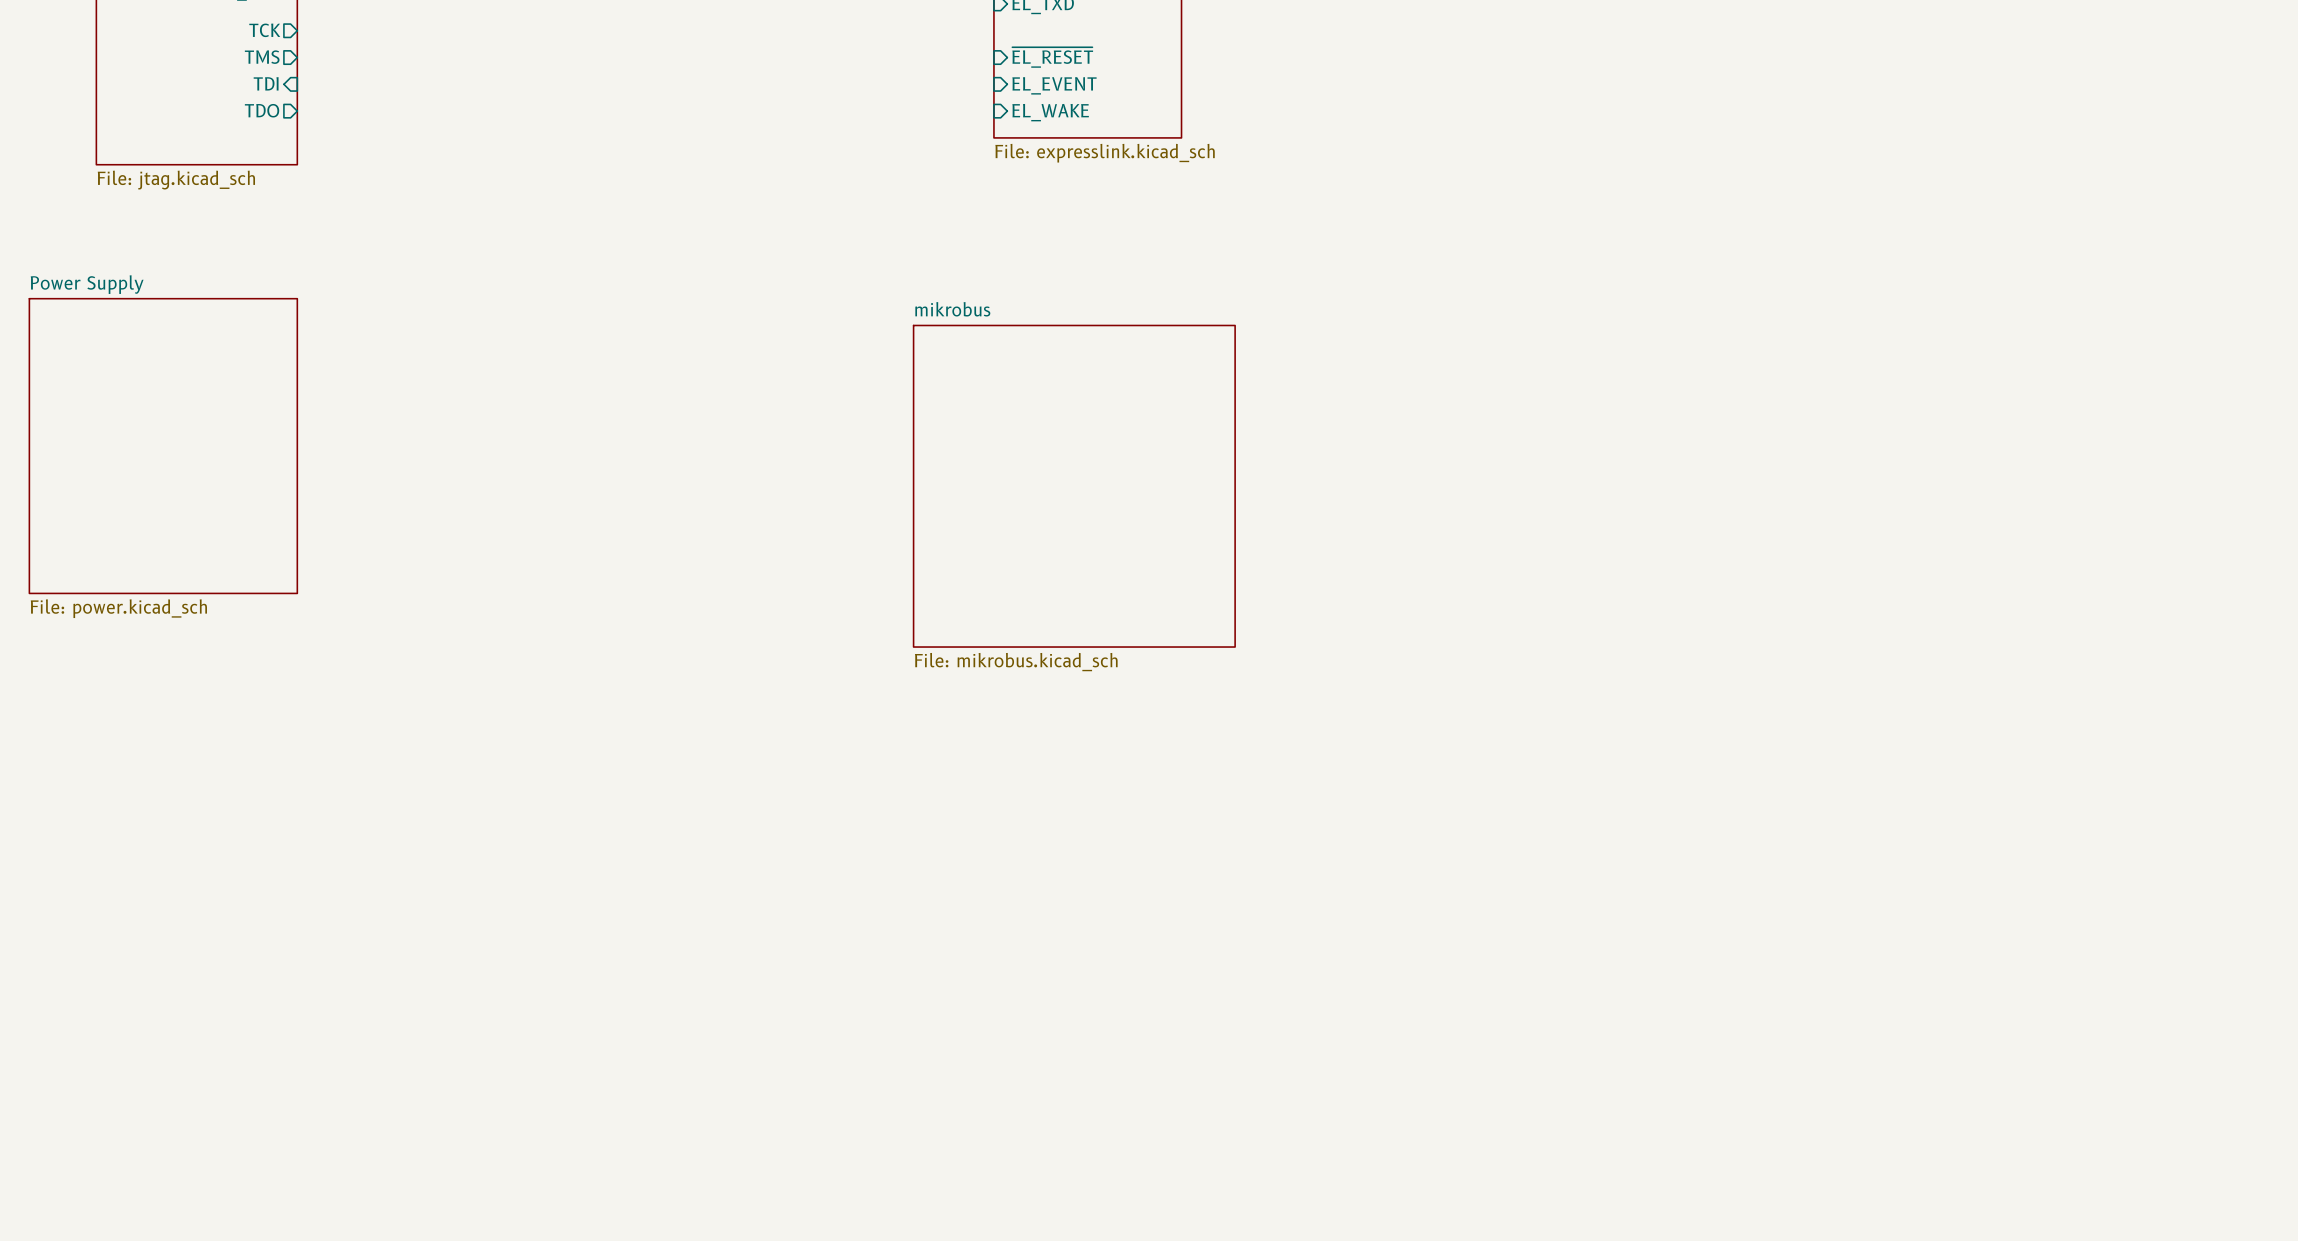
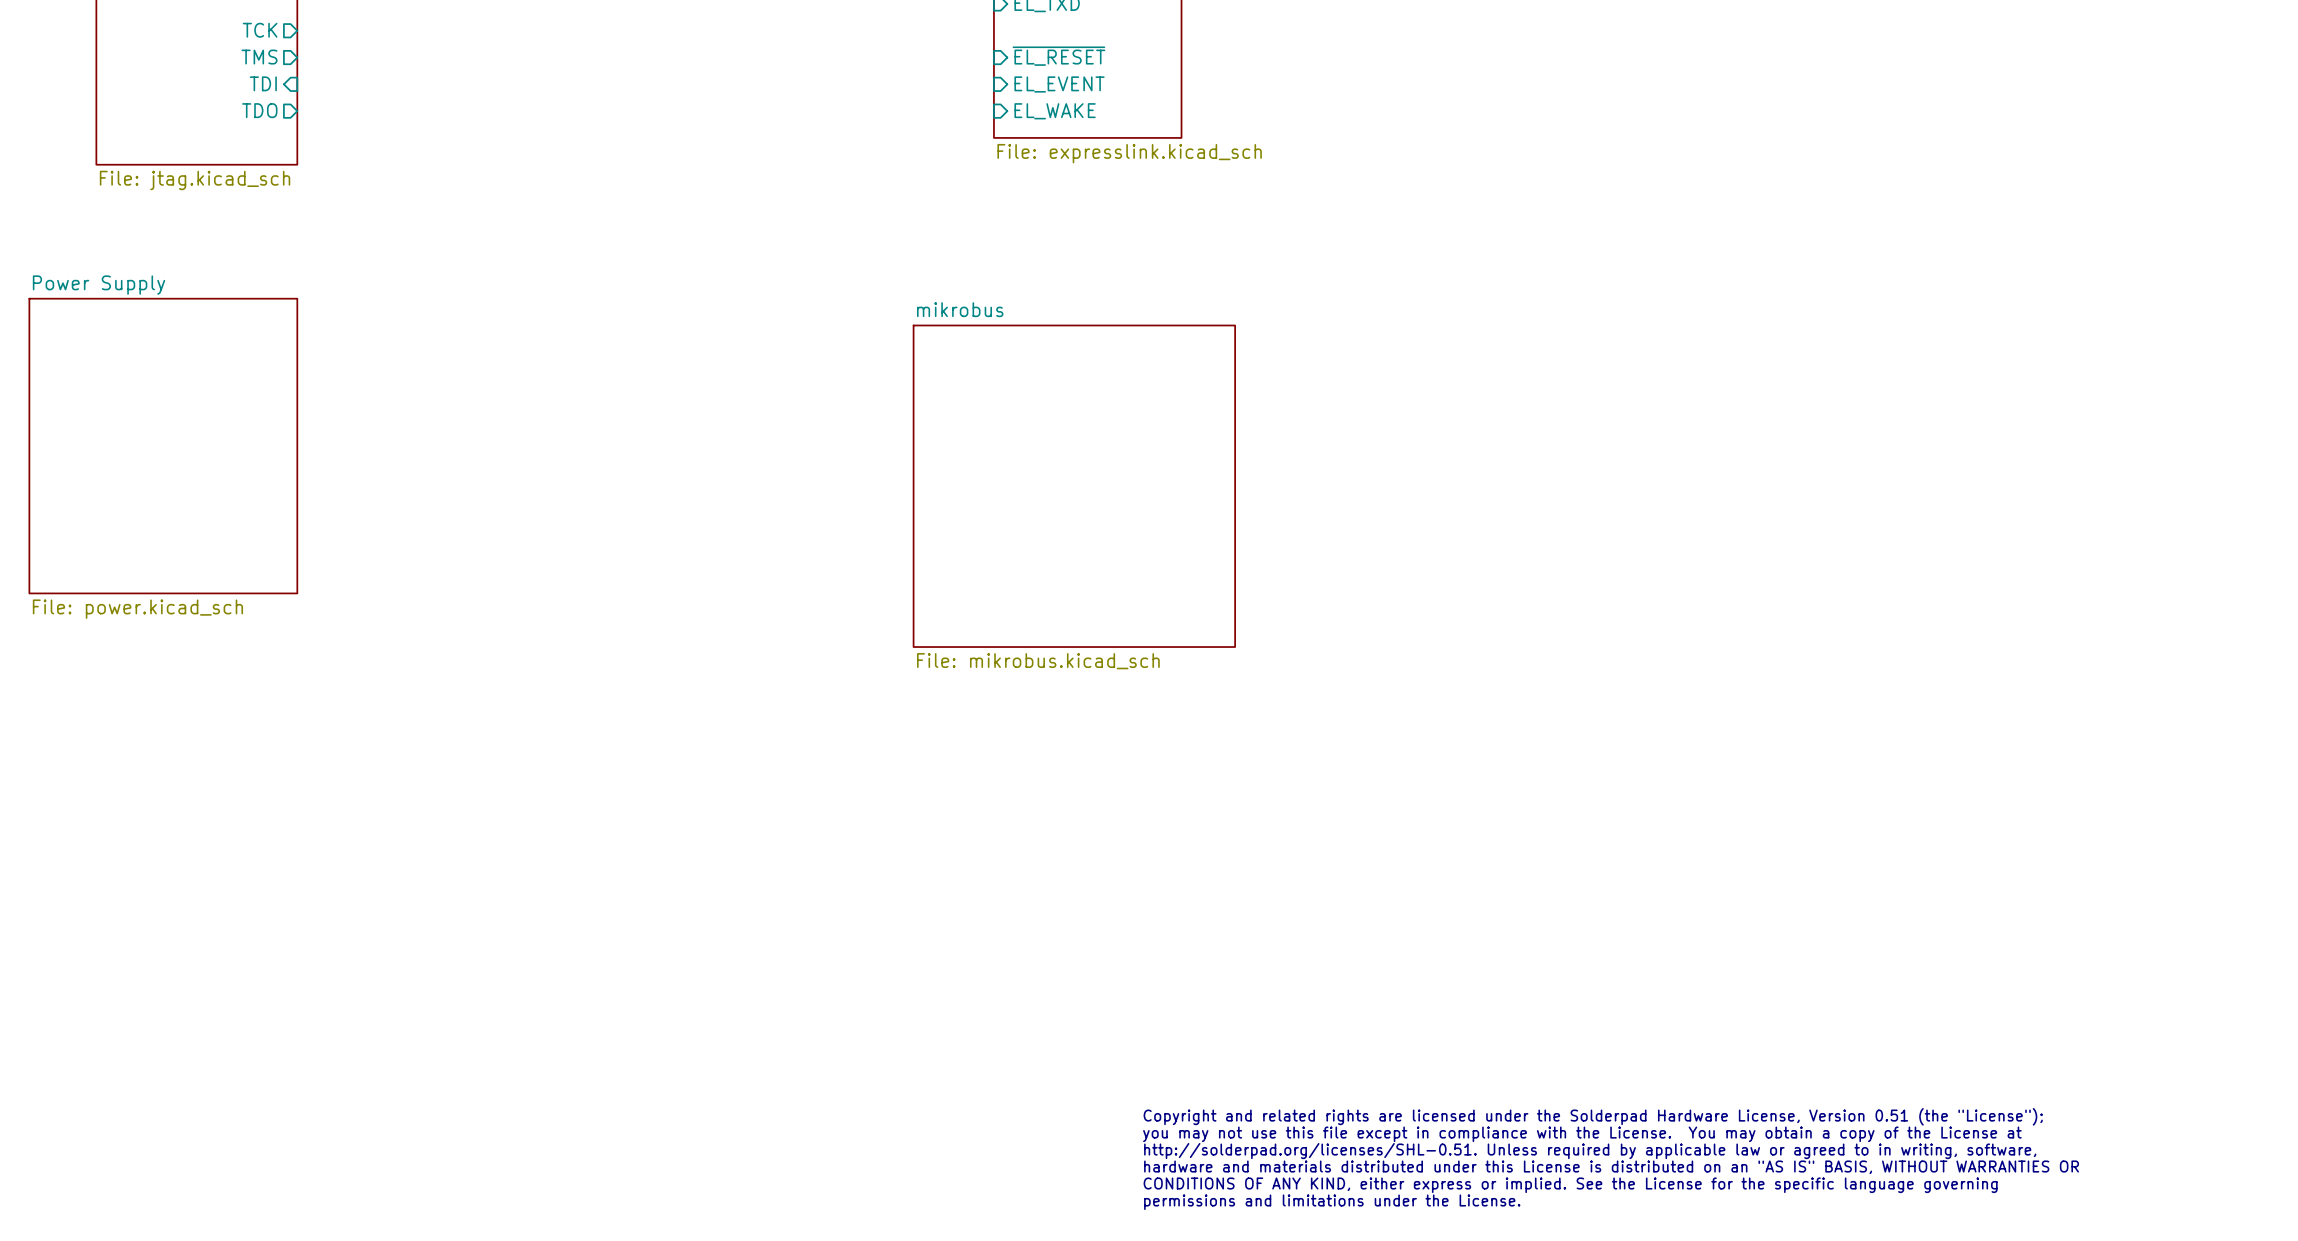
text: none -> Copyright and related rights are licensed under the Solderpad Hardware License, Version 0.51 (the "License"); (1593, 1116)
text: none -> you may not use this file except in compliance with the License. You may obtain a copy of the License at (1582, 1134)
text: none -> http://solderpad.org/licenses/SHL-0.51. Unless required by applicable law or agreed to in writing, software, (1590, 1151)
text: none -> hardware and materials distributed under this License is distributed on an "AS IS" BASIS, WITHOUT WARRANTIES OR (1611, 1167)
text: none -> CONDITIONS OF ANY KIND, either express or implied. See the License for the specific language governing (1570, 1185)
text: none -> permissions and limitations under the License. (1332, 1202)

